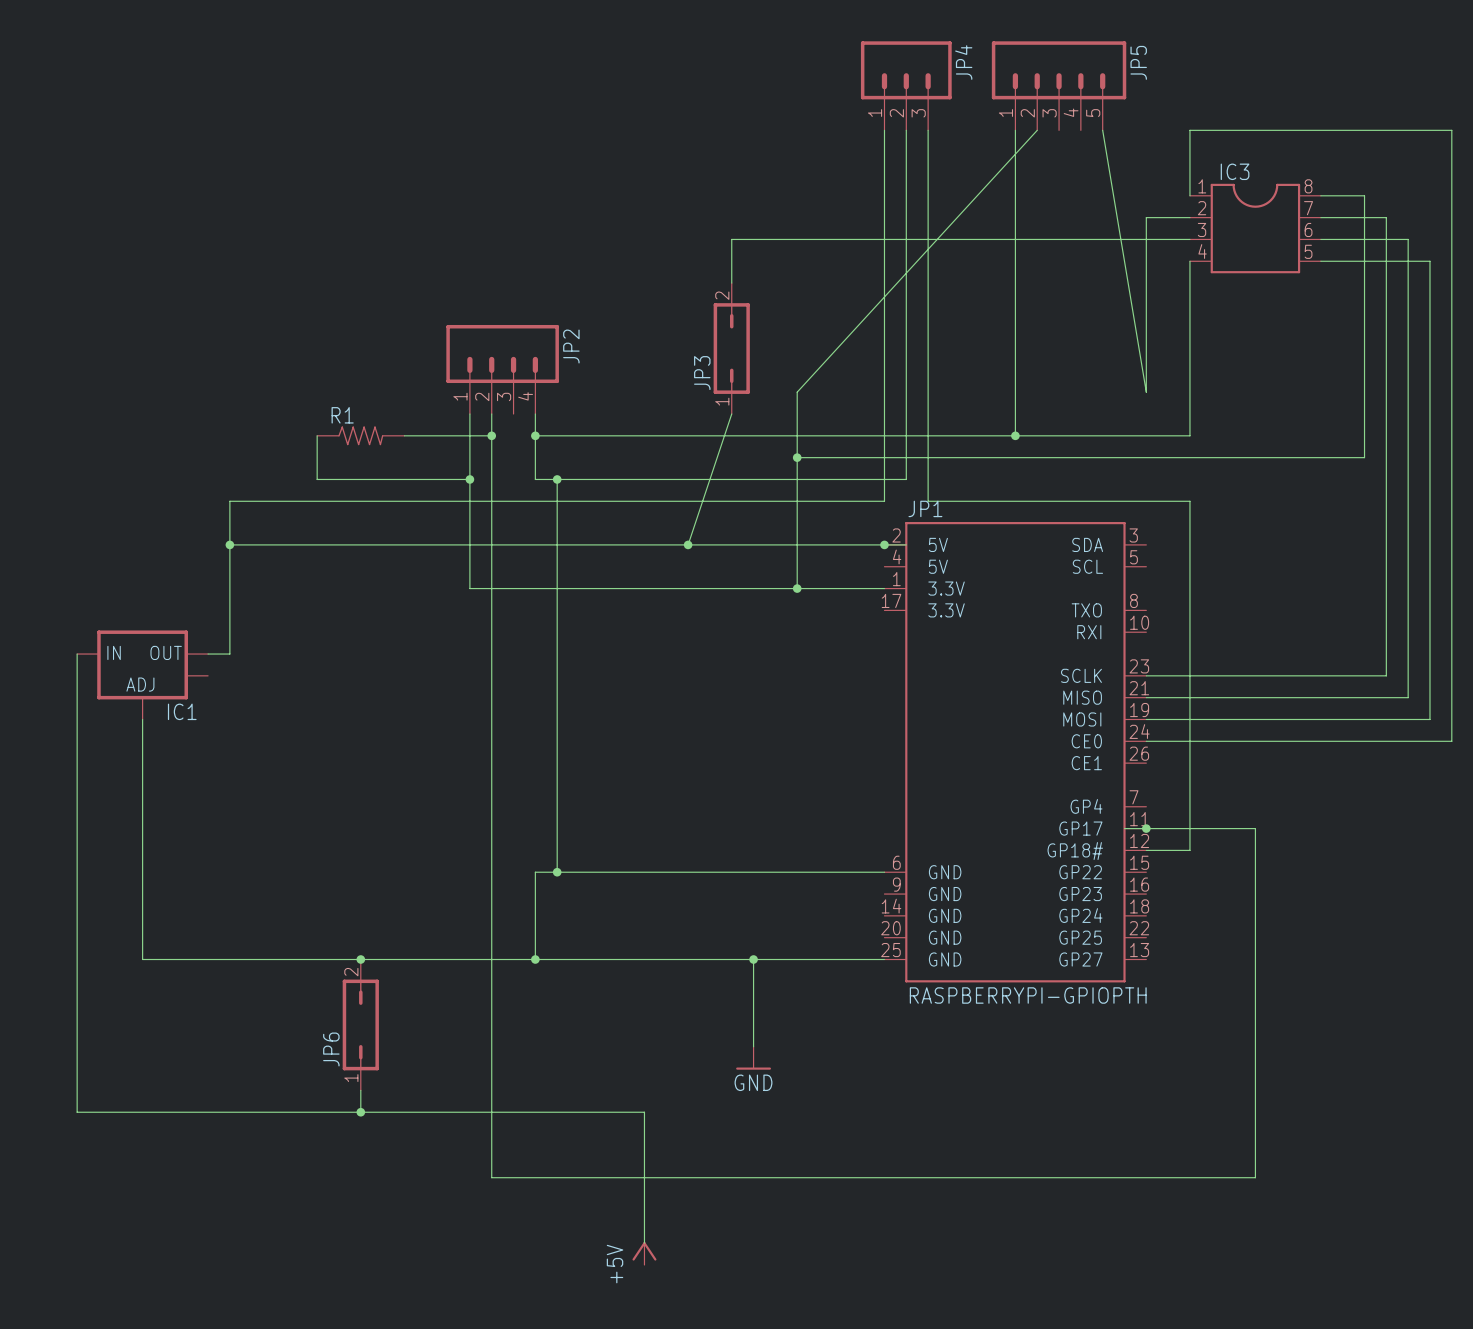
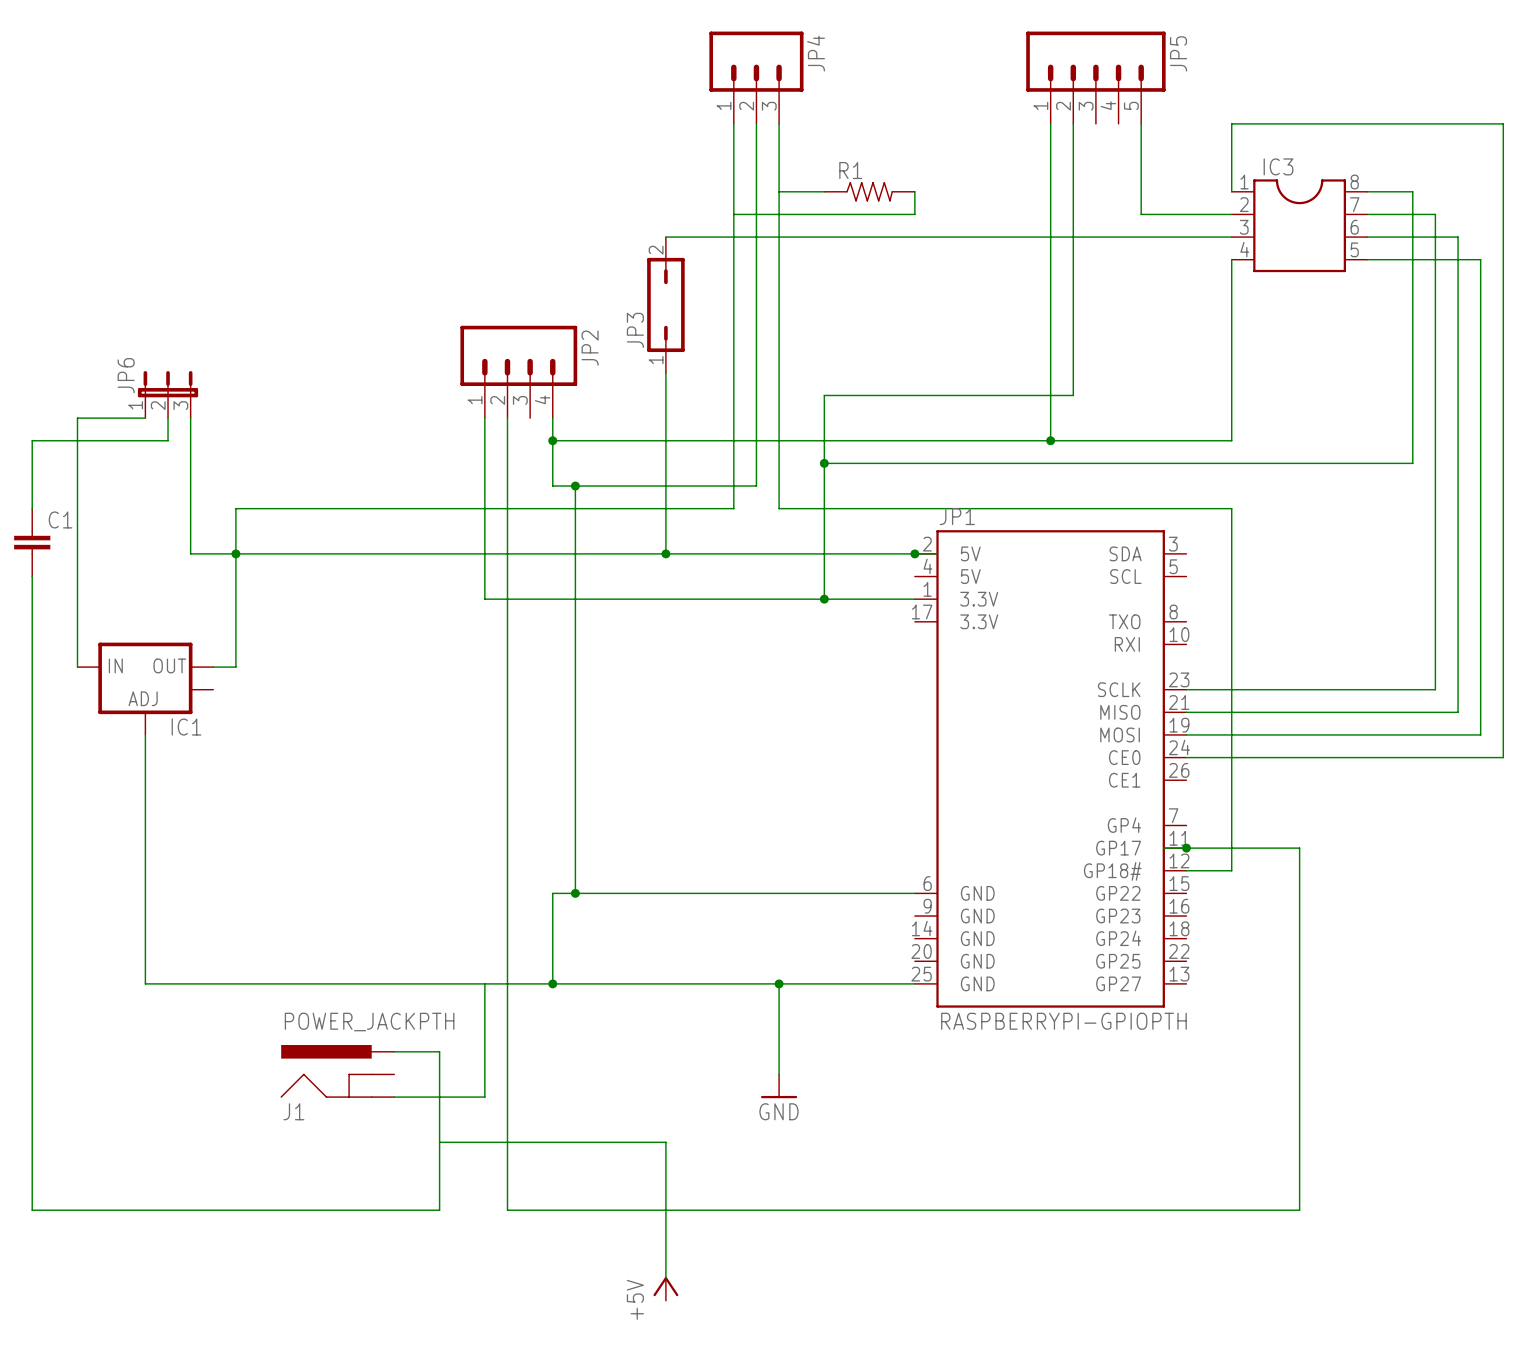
JP4 position: (906, 85) -> (756, 77)
wire: none -> (756, 123) (756, 237) (665, 237)
wire: (884, 130) (884, 195) -> none
wire: (906, 130) (906, 479) (731, 479) -> (756, 282) (756, 486)
wire: (928, 130) (928, 501) -> (779, 123) (779, 508)
wire: (1037, 130) (797, 392) -> (1073, 123) (1073, 395) (824, 395)
wire: (1102, 130) (1146, 392) (1146, 217) -> (1141, 123) (1141, 214) (1186, 214)
wire: none -> (779, 191) (824, 191)
wire: none -> (733, 214) (914, 214)
wire: (884, 217) (884, 501) -> (960, 508) (914, 508)
JP3 position: (731, 348) -> (665, 304)
wire: none -> (665, 372) (665, 553)
wire: none -> (168, 418) (168, 440) (32, 440) (32, 508)
wire: none -> (190, 418) (190, 553) (235, 553)
wire: (731, 414) (688, 544) -> none
wire: (317, 435) (317, 479) (469, 479) -> none
R1 position: (360, 435) -> (869, 191)
wire: (404, 435) (491, 435) -> none
junction: (491, 435) -> none
junction: (469, 479) -> none
wire: (709, 501) (753, 501) -> (733, 508) (733, 123)
C1: none -> (32, 542)
junction position: (688, 544) -> (665, 553)
wire: none -> (32, 576) (32, 1210) (439, 1210) (439, 1051) (394, 1051)
wire: (77, 654) (77, 1112) (426, 1112) -> (77, 667) (77, 418) (145, 418)
JP6 symbol: [342, 959, 379, 1091] -> [137, 371, 199, 419]
junction: (360, 959) -> none
wire: none -> (484, 983) (484, 1097) (394, 1097)
J1: none -> POWER_JACKPTH (337, 1071)
JP6 name position: JP6 (331, 1049) -> JP6 (126, 375)
wire: (360, 1090) (360, 1112) -> none
junction: (360, 1112) -> none

